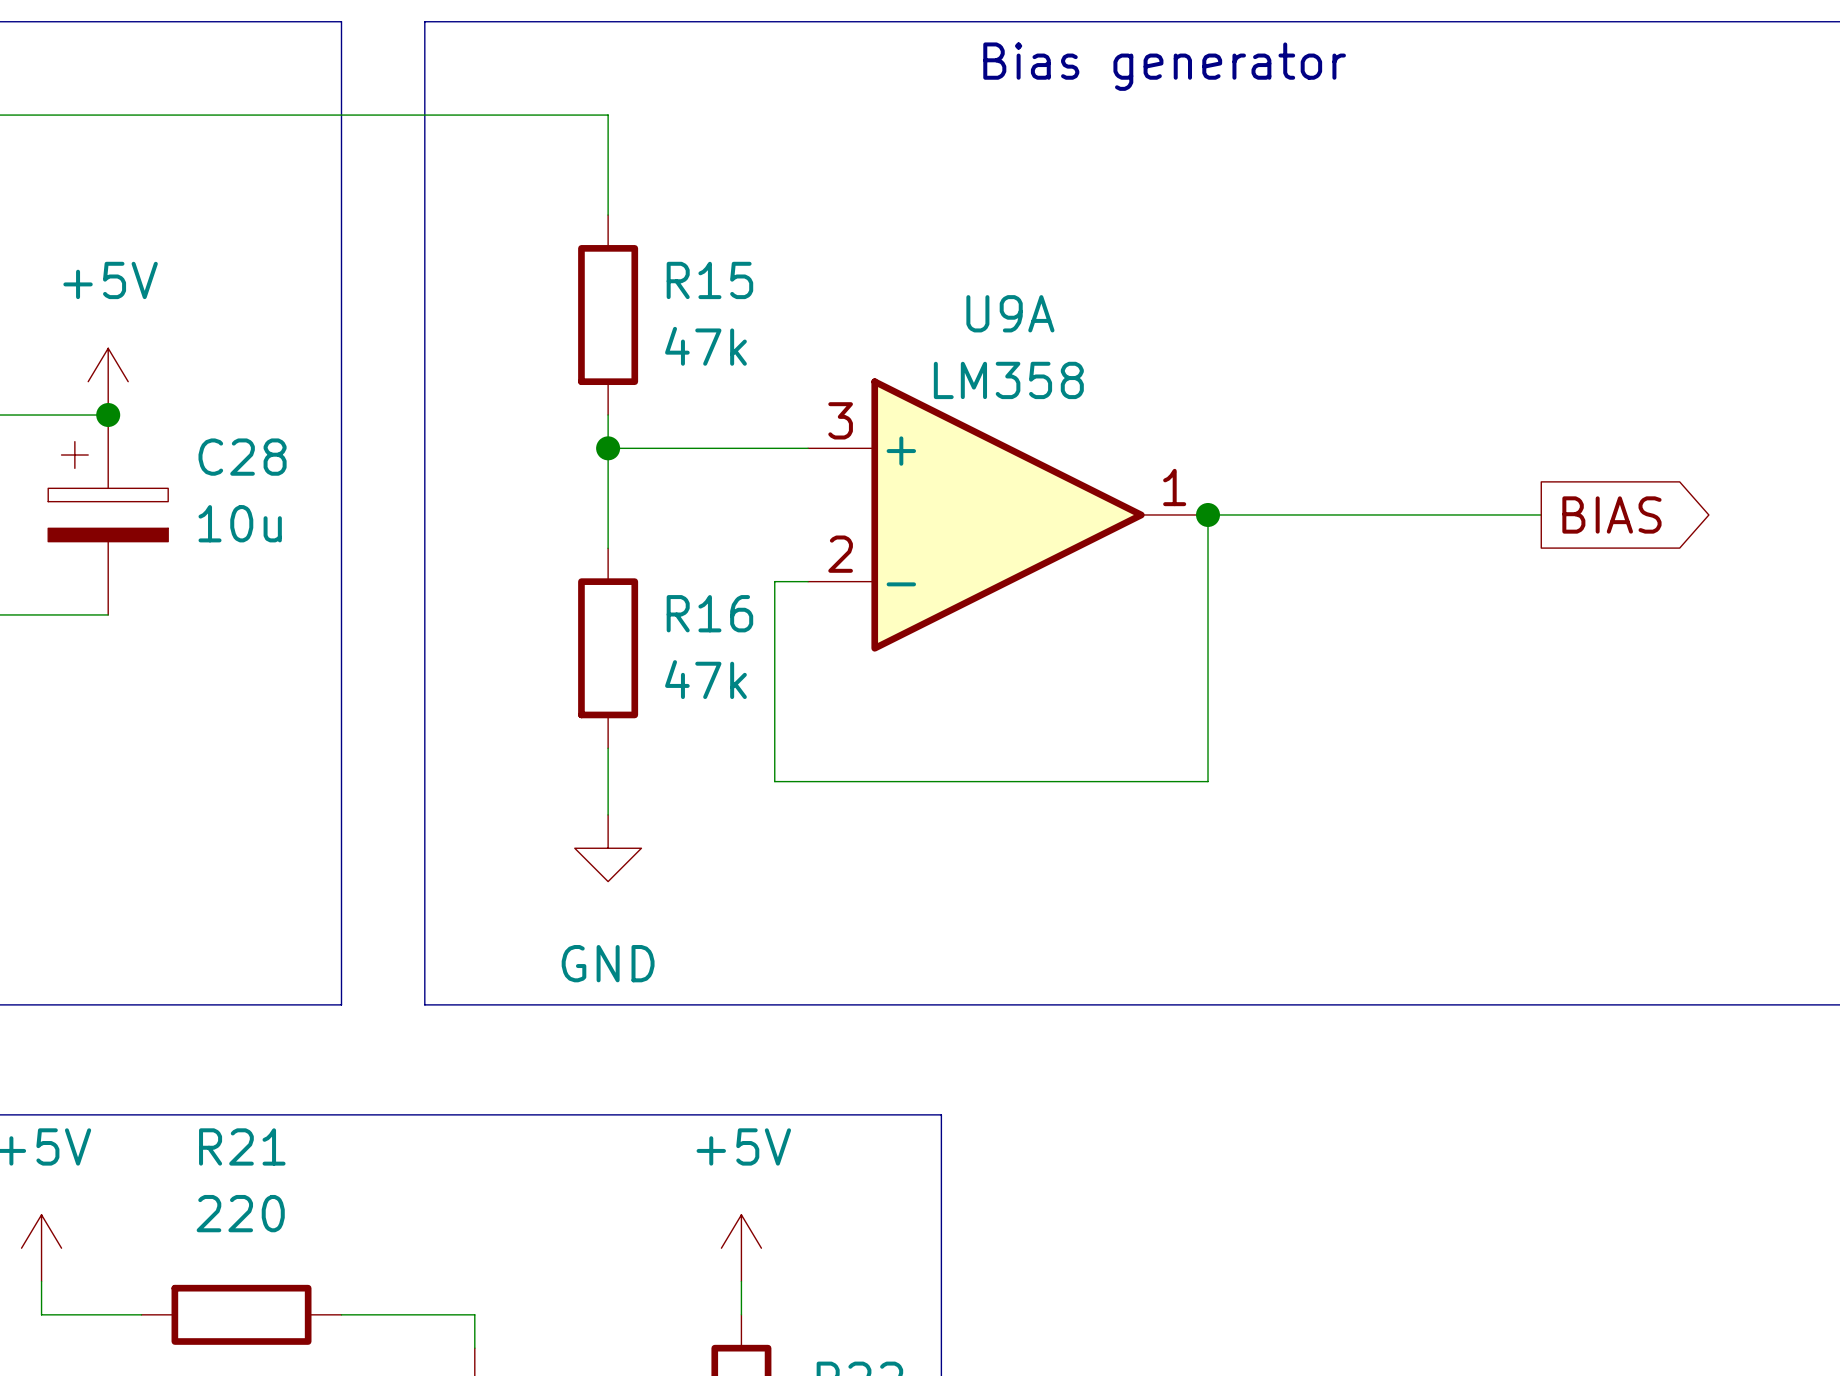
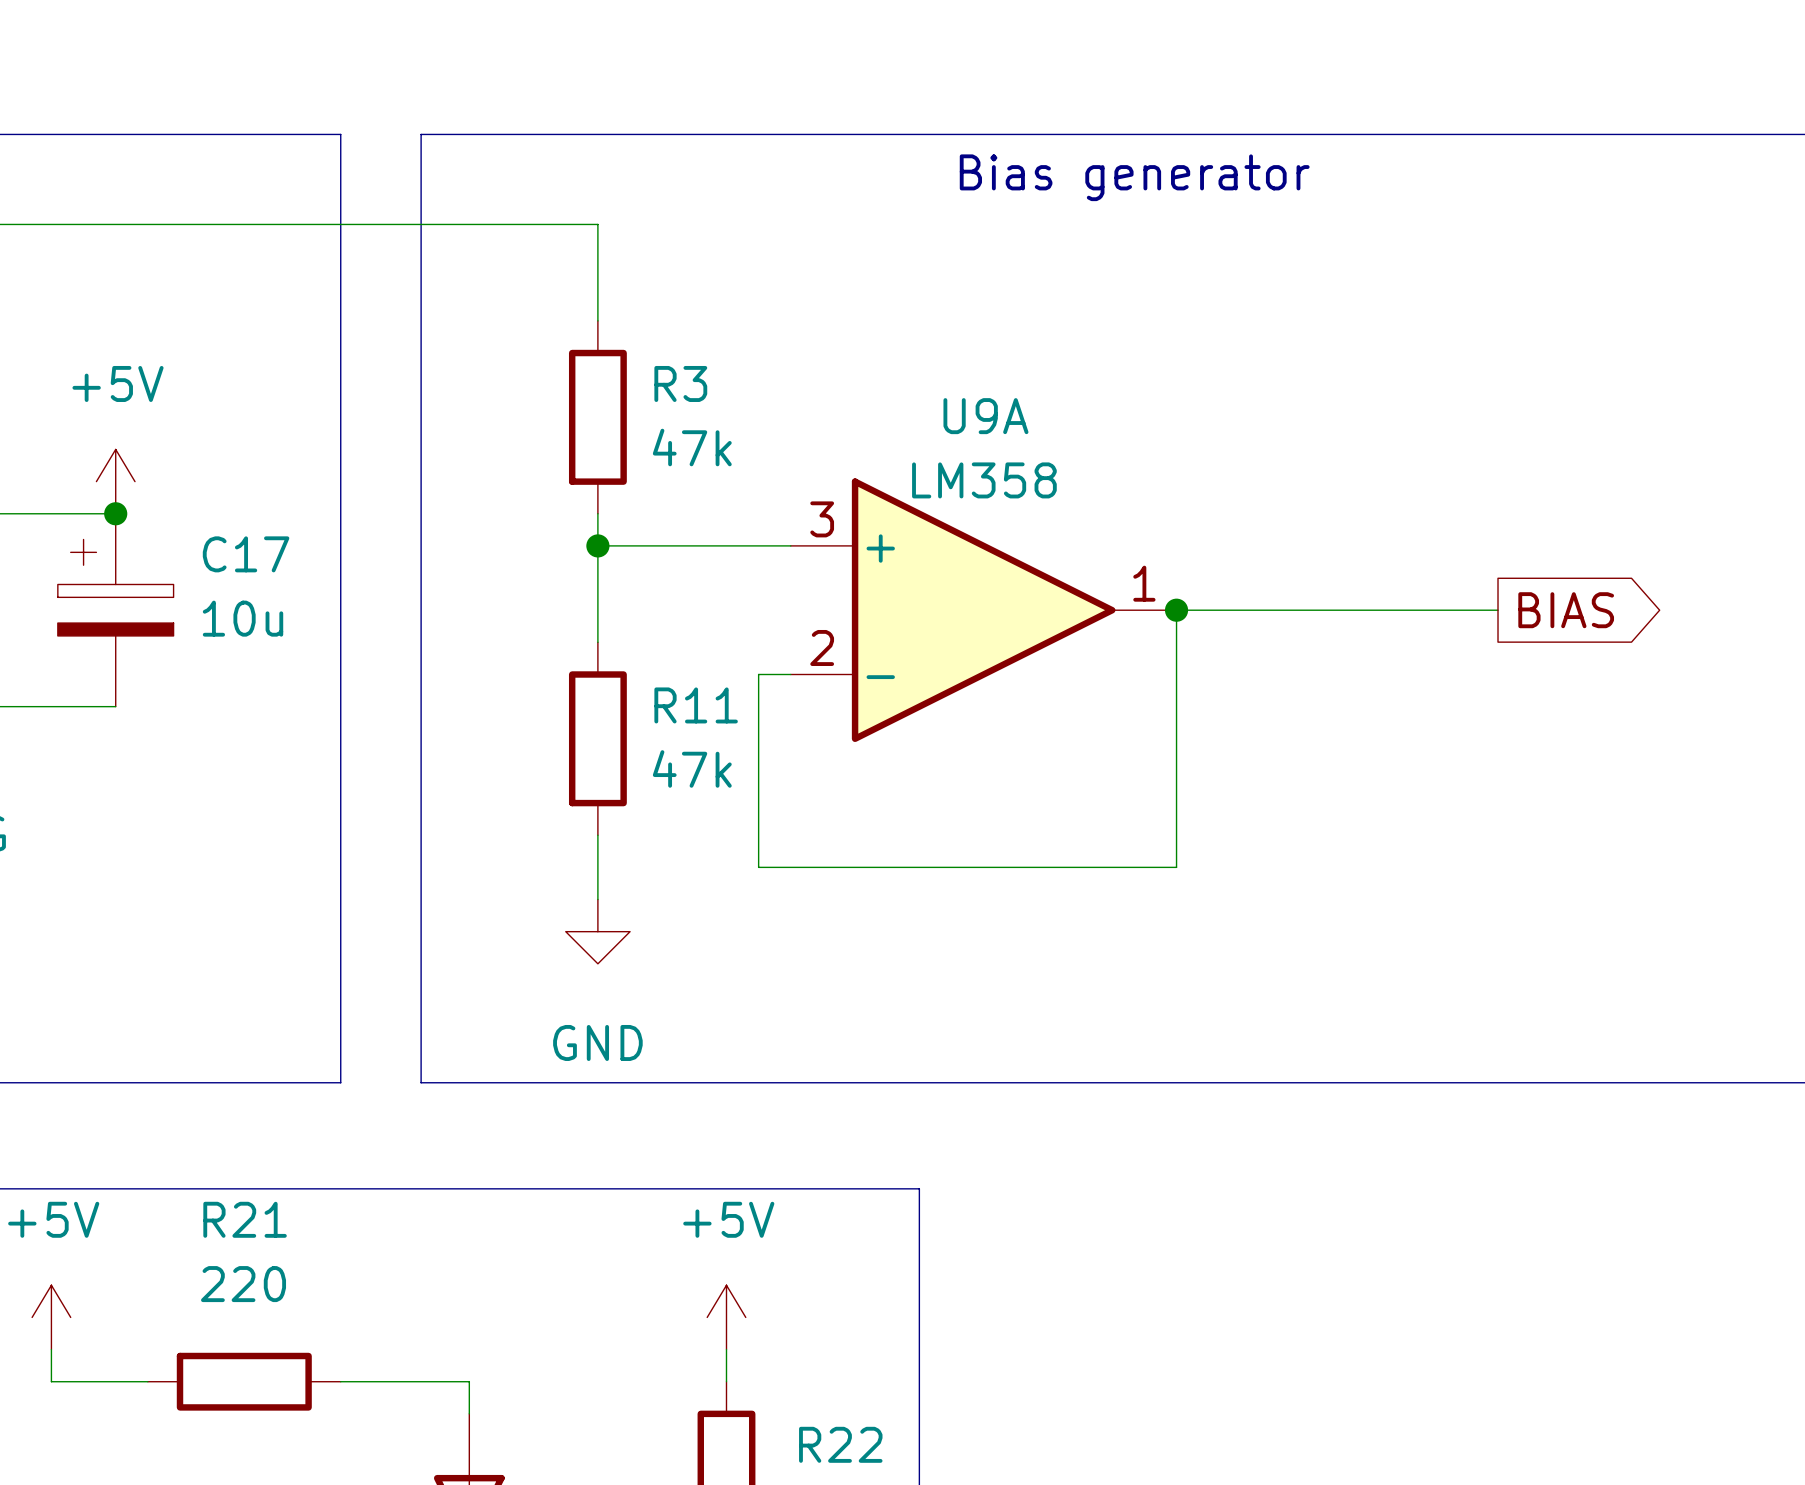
R15 name: R15 (709, 280) -> R3 (680, 383)
C28 name: C28 (242, 457) -> C17 (246, 554)
R16 name: R16 (709, 613) -> R11 (696, 705)

